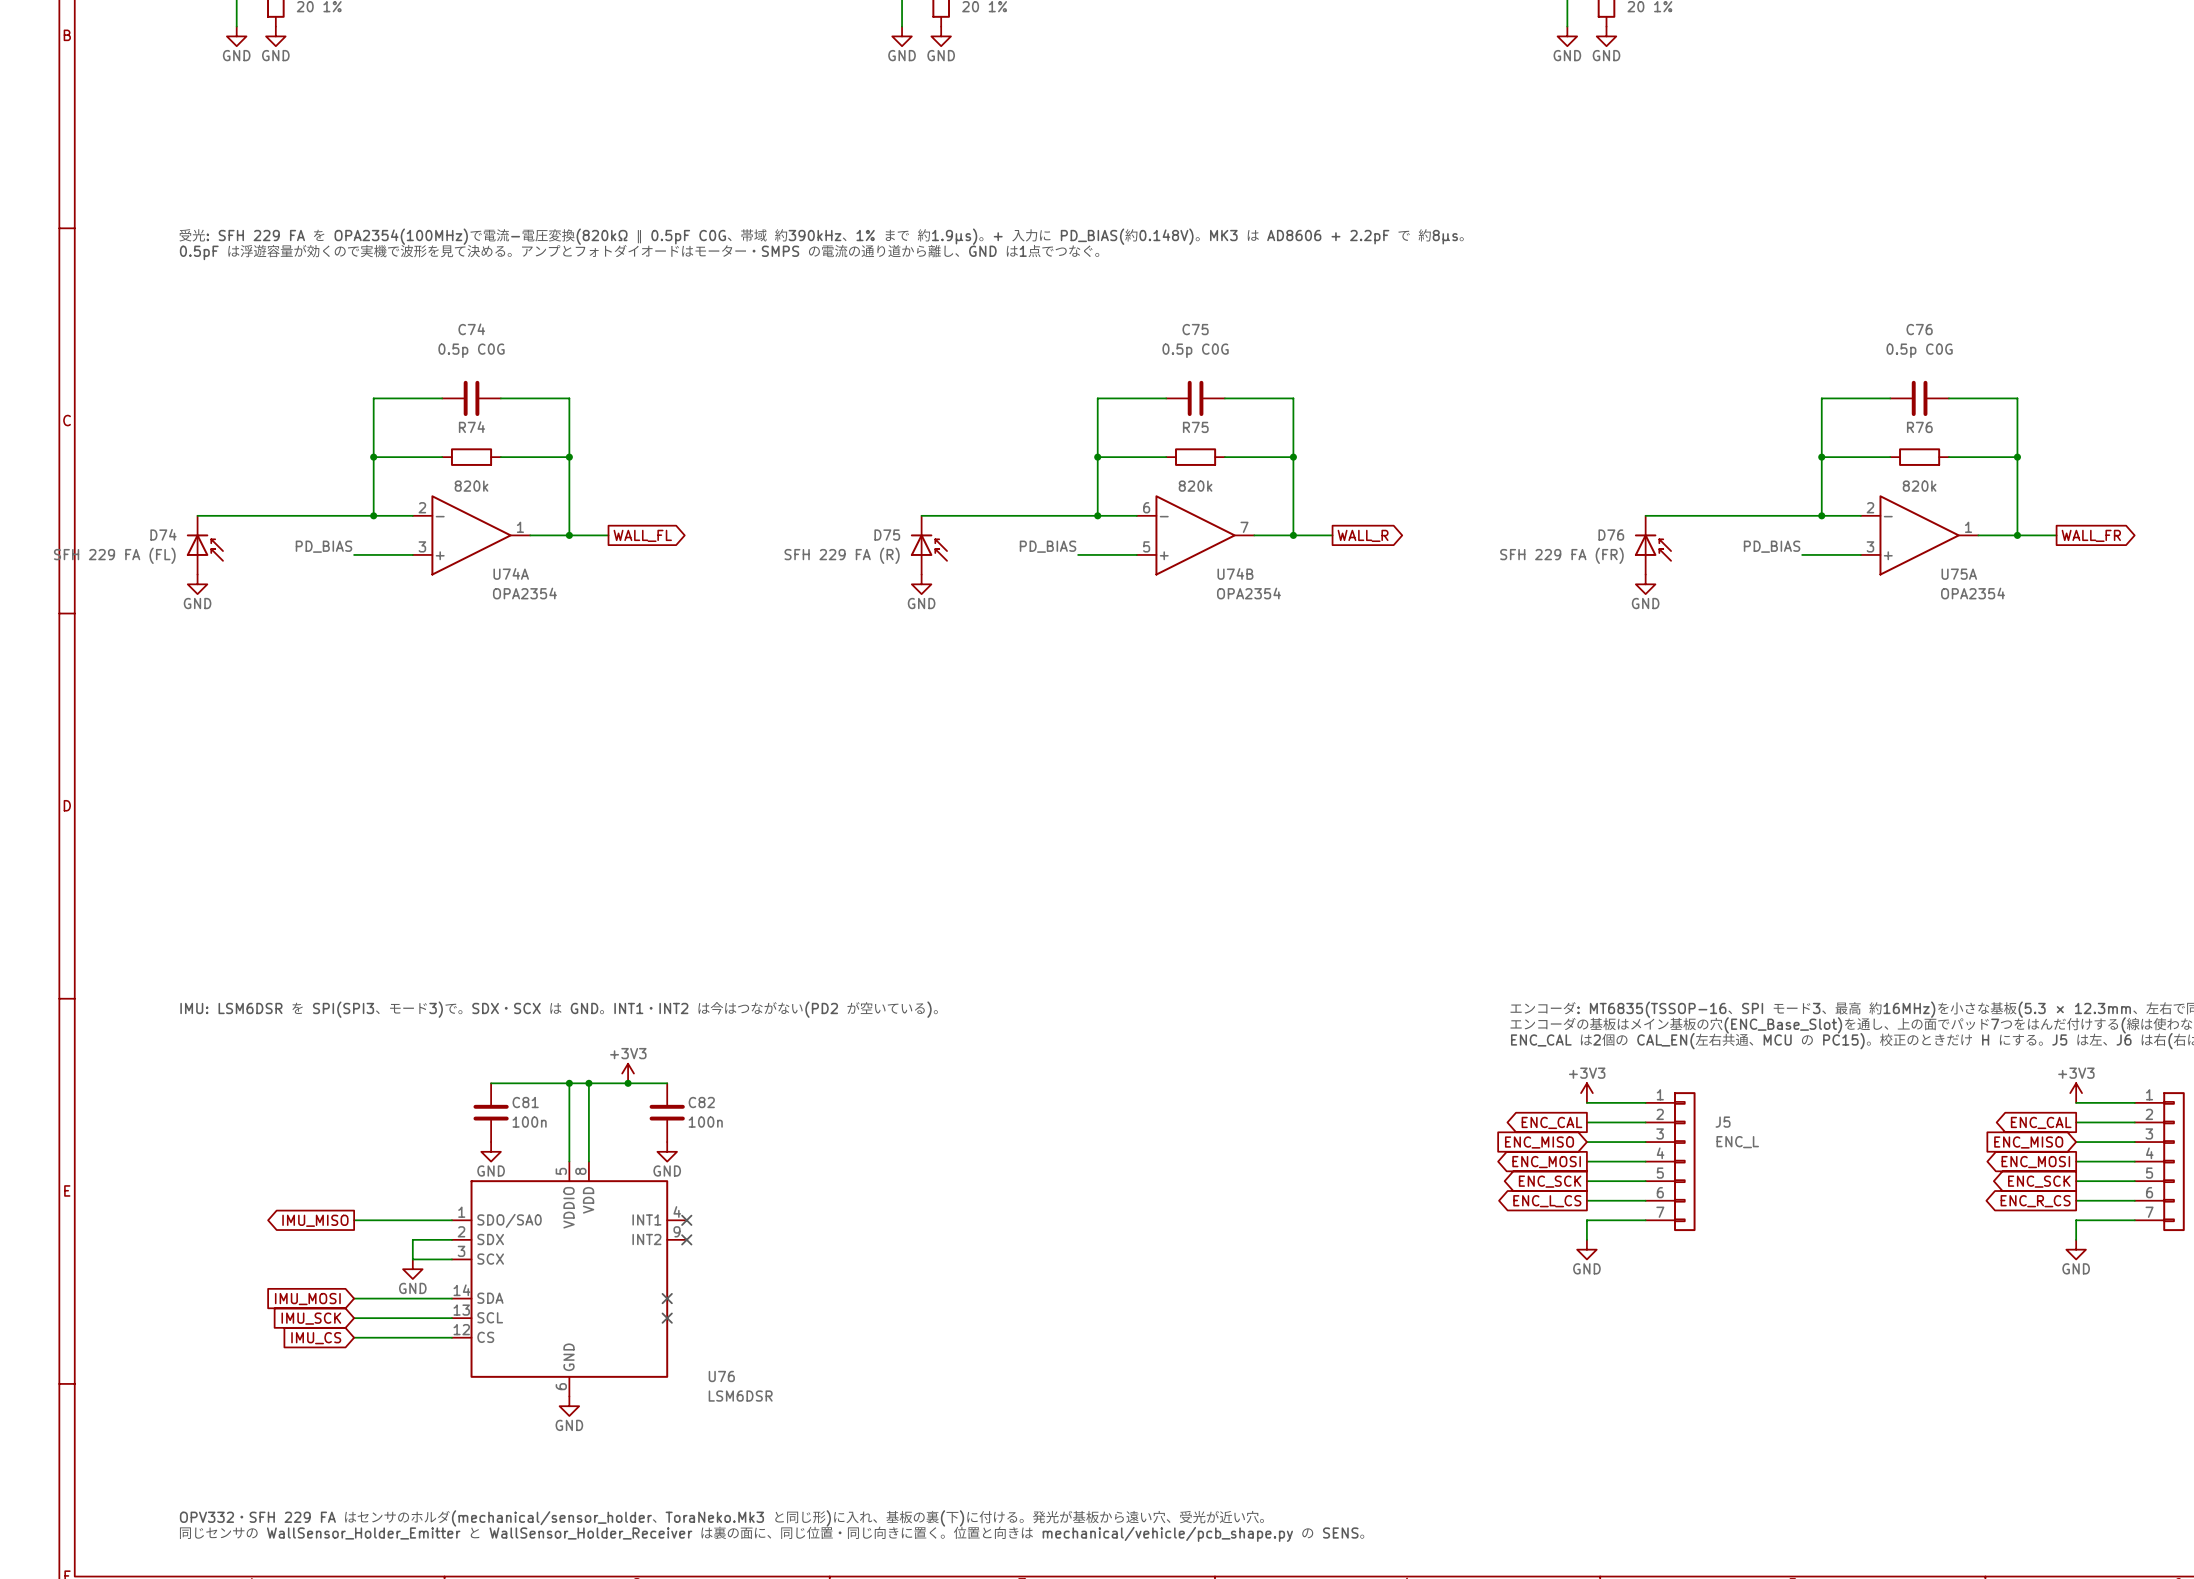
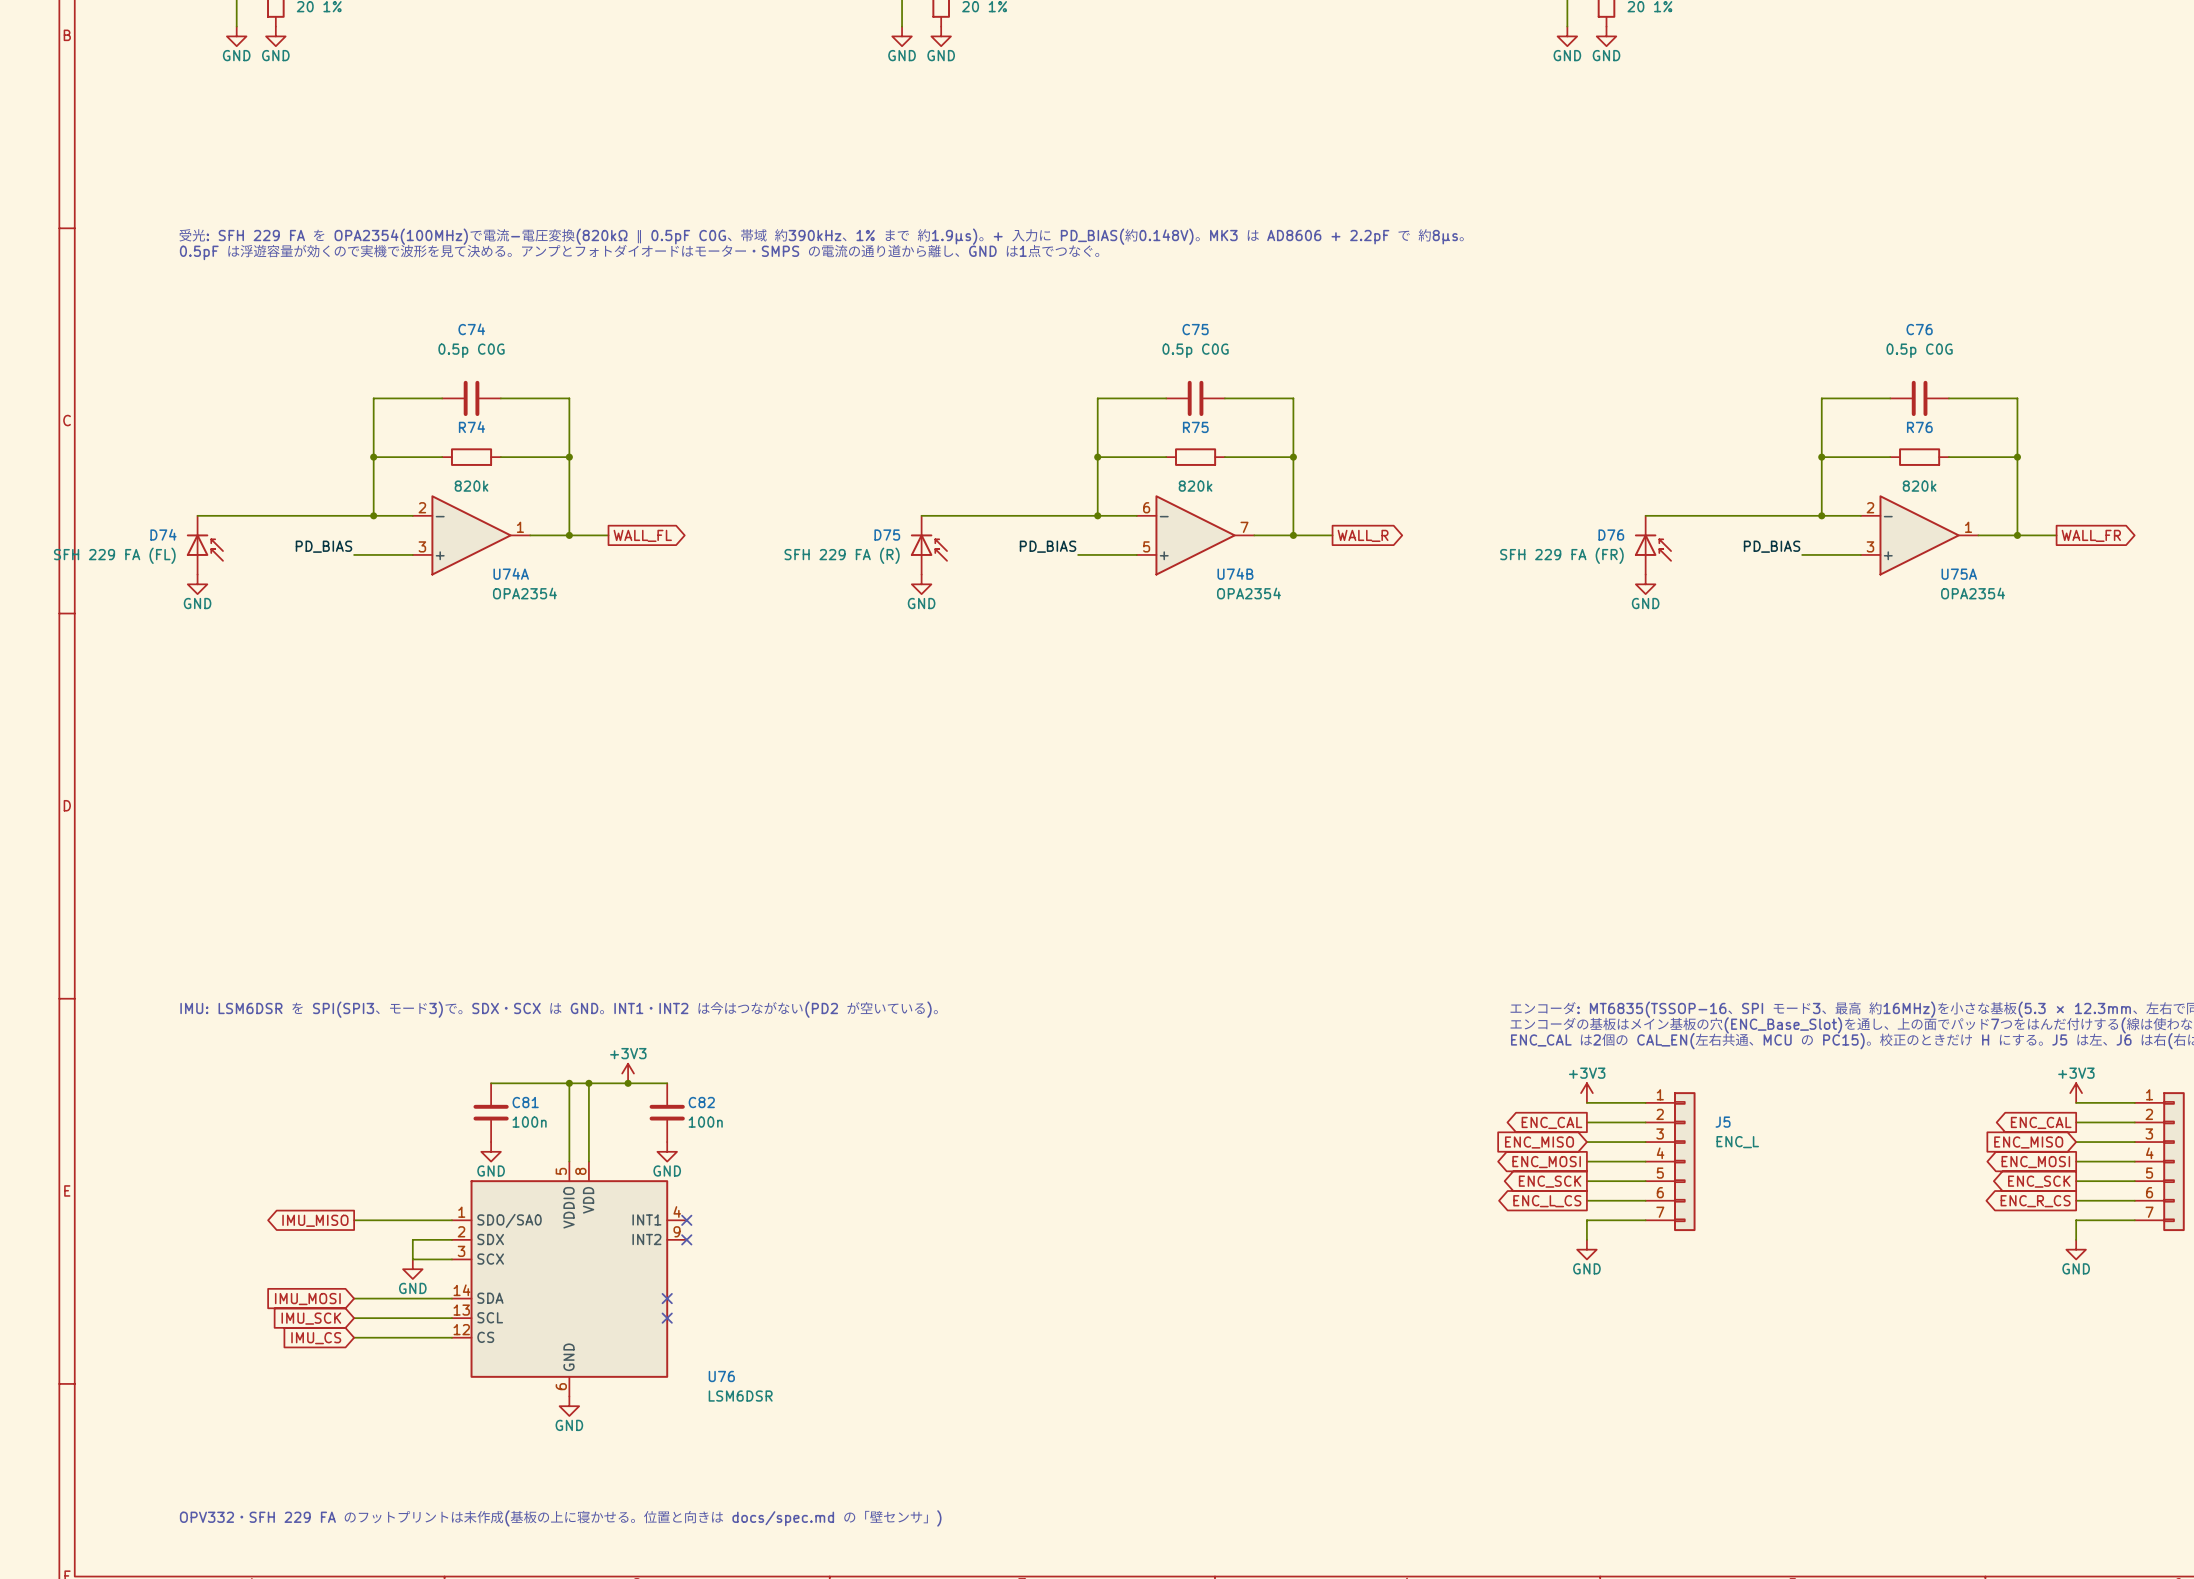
text: OPV332・SFH 229 FA はセンサのホルダ(mechanical/sensor_holder、ToraNeko.Mk3 と同じ形)に入れ、基板の裏(下)に付ける。発光が基板から遠い穴、受光が近い穴。 (722, 1518) -> OPV332・SFH 229 FA のフットプリントは未作成(基板の上に寝かせる。位置と向きは docs/spec.md の「壁センサ」) (560, 1518)
text: 同じセンサの WallSensor_Holder_Emitter と WallSensor_Holder_Receiver は裏の面に、同じ位置・同じ向きに置く。位置と向きは mechanical/vehicle/pcb_shape.py の SENS。 (772, 1533) -> none

